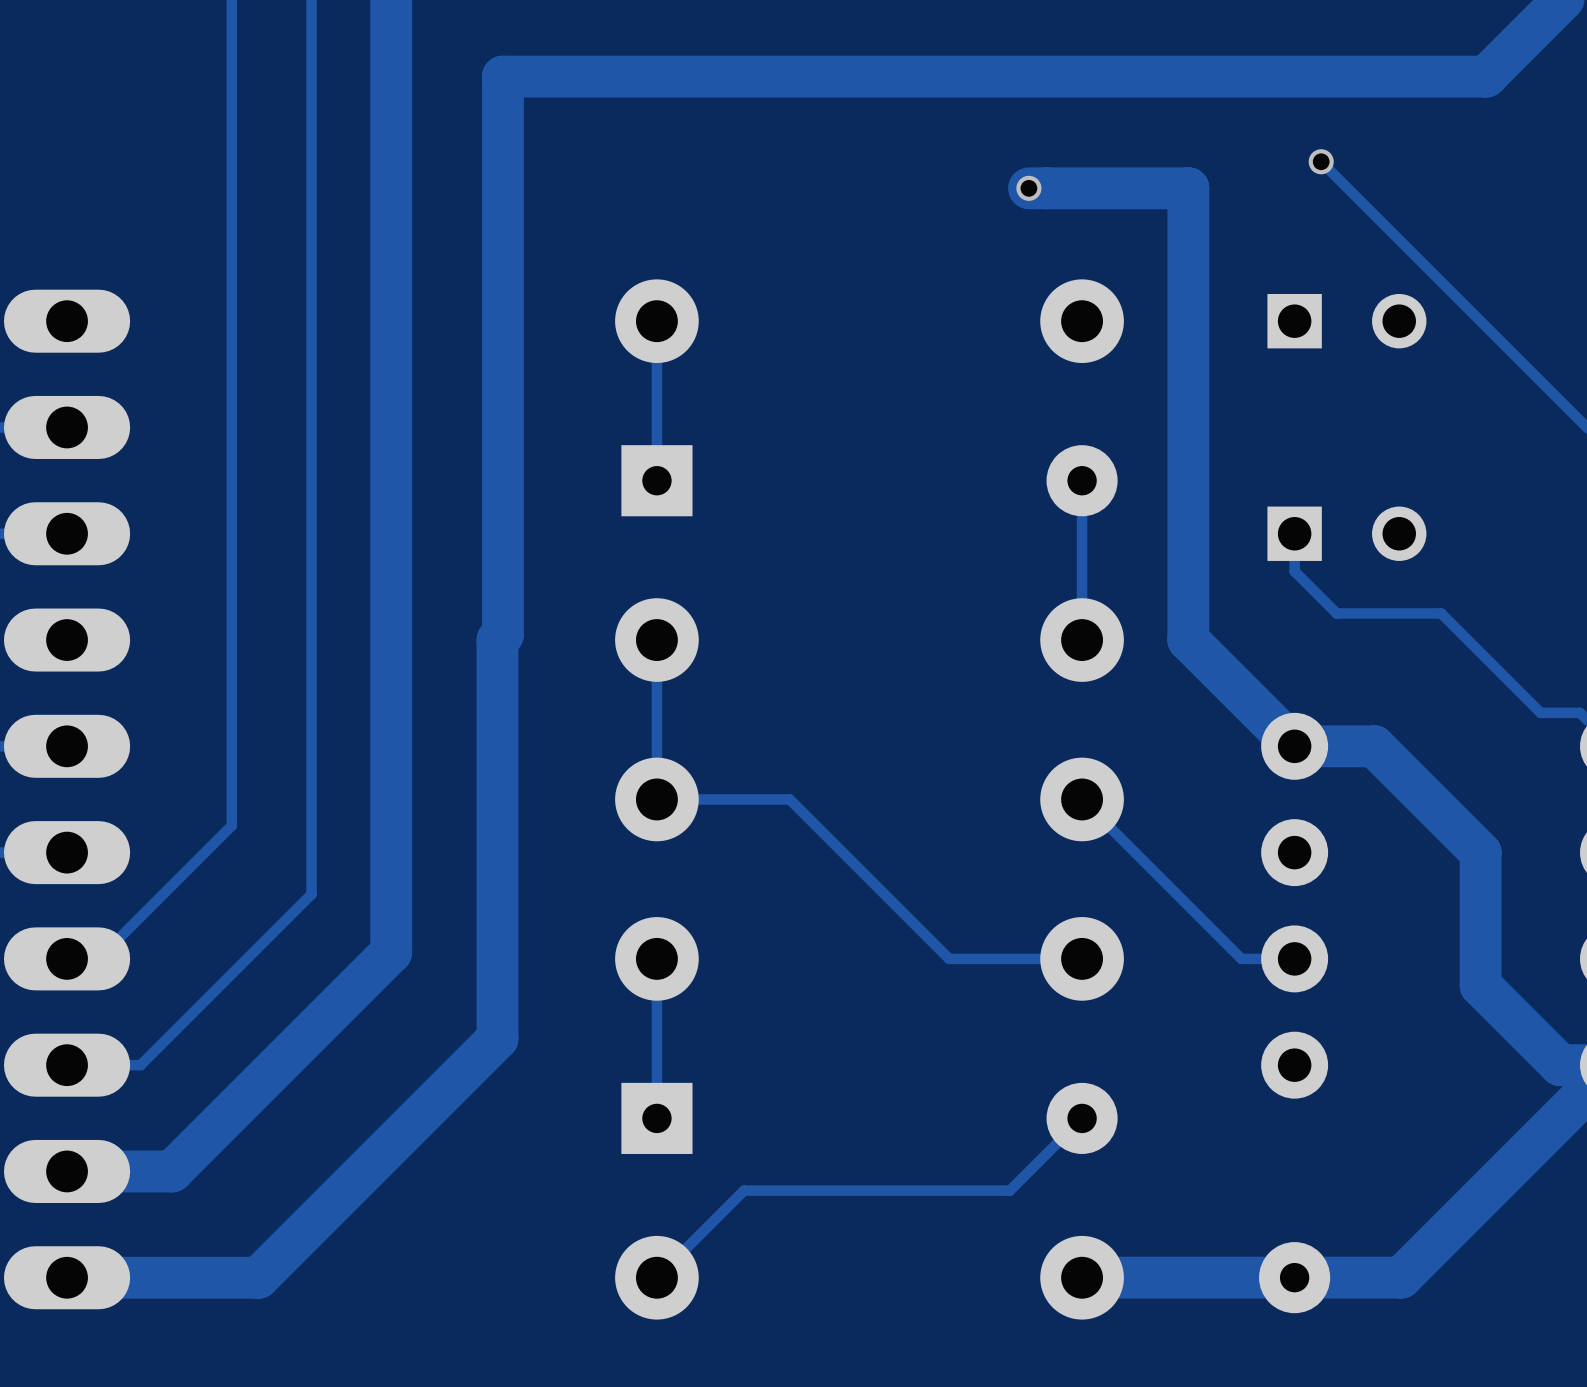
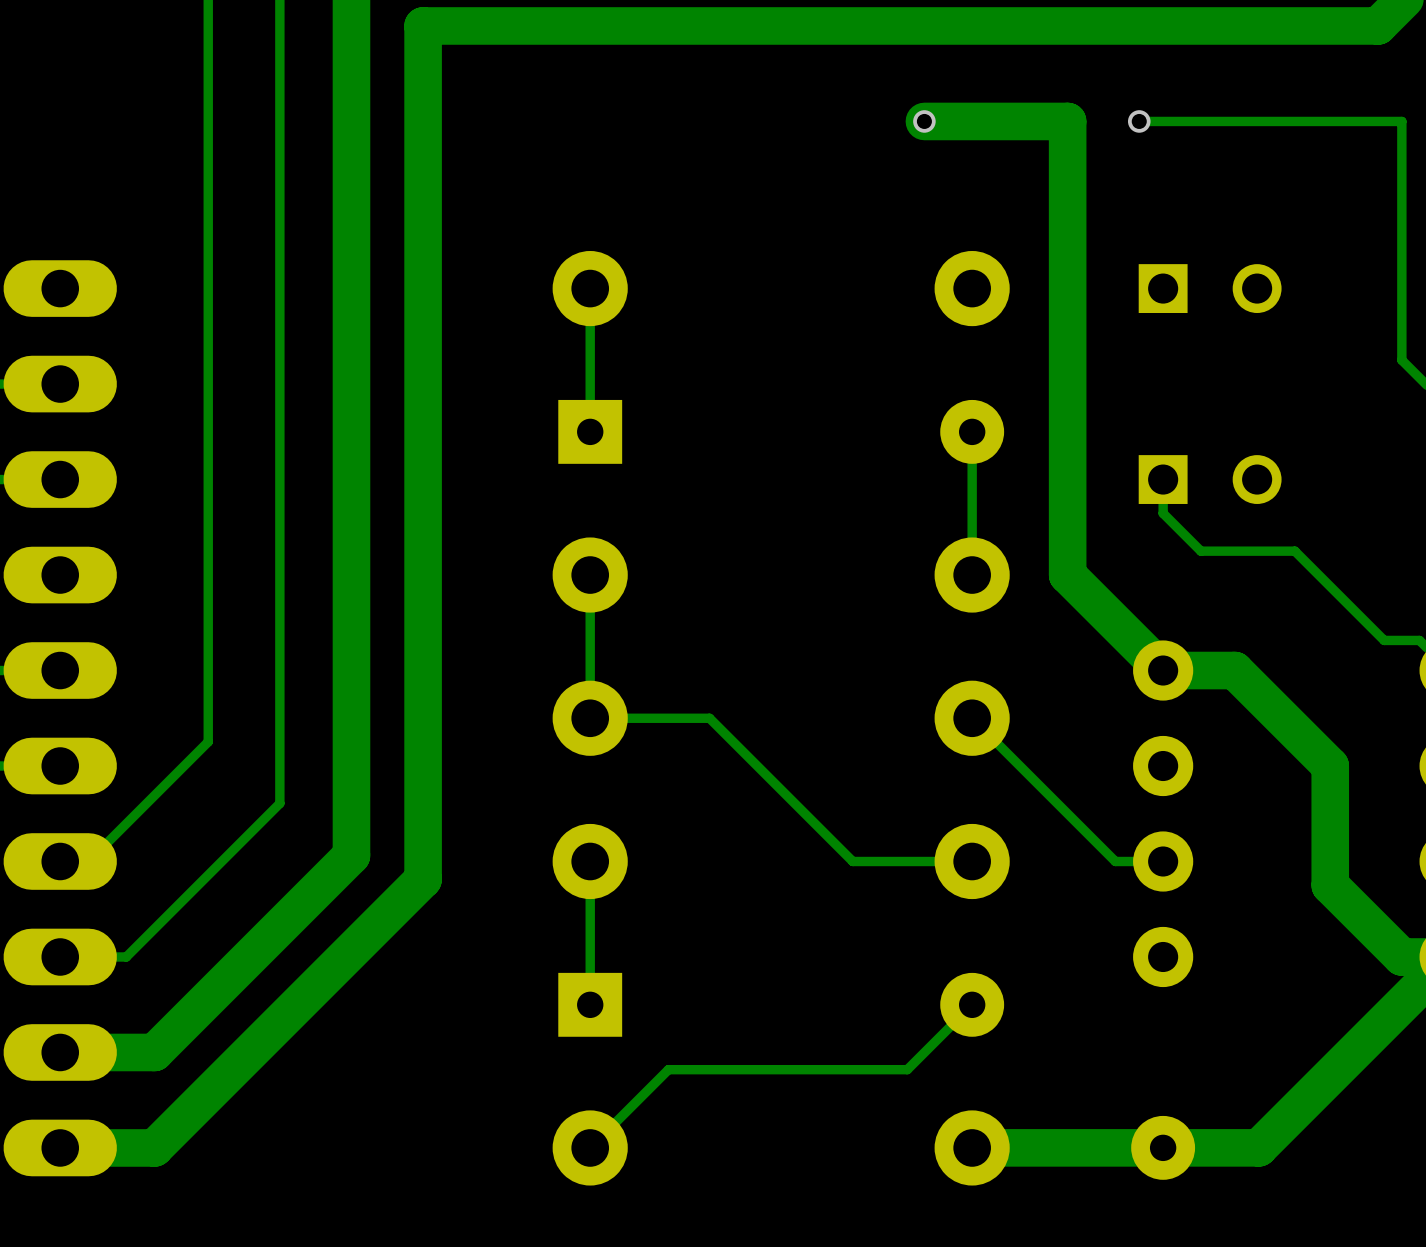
track: (1533, 28) (1486, 76) (502, 76) (502, 634) (497, 640) (497, 1038) (258, 1277) (171, 1277) -> (1377, 25) (423, 25) (423, 879) (154, 1147)
track: (1321, 161) (1560, 400) -> (1139, 121) (1401, 121) (1401, 360)
via position: (1321, 161) -> (1139, 121)
via position: (1028, 188) -> (924, 121)
track: (1188, 188) (1028, 188) -> (1067, 169) (1067, 121) (924, 121)

